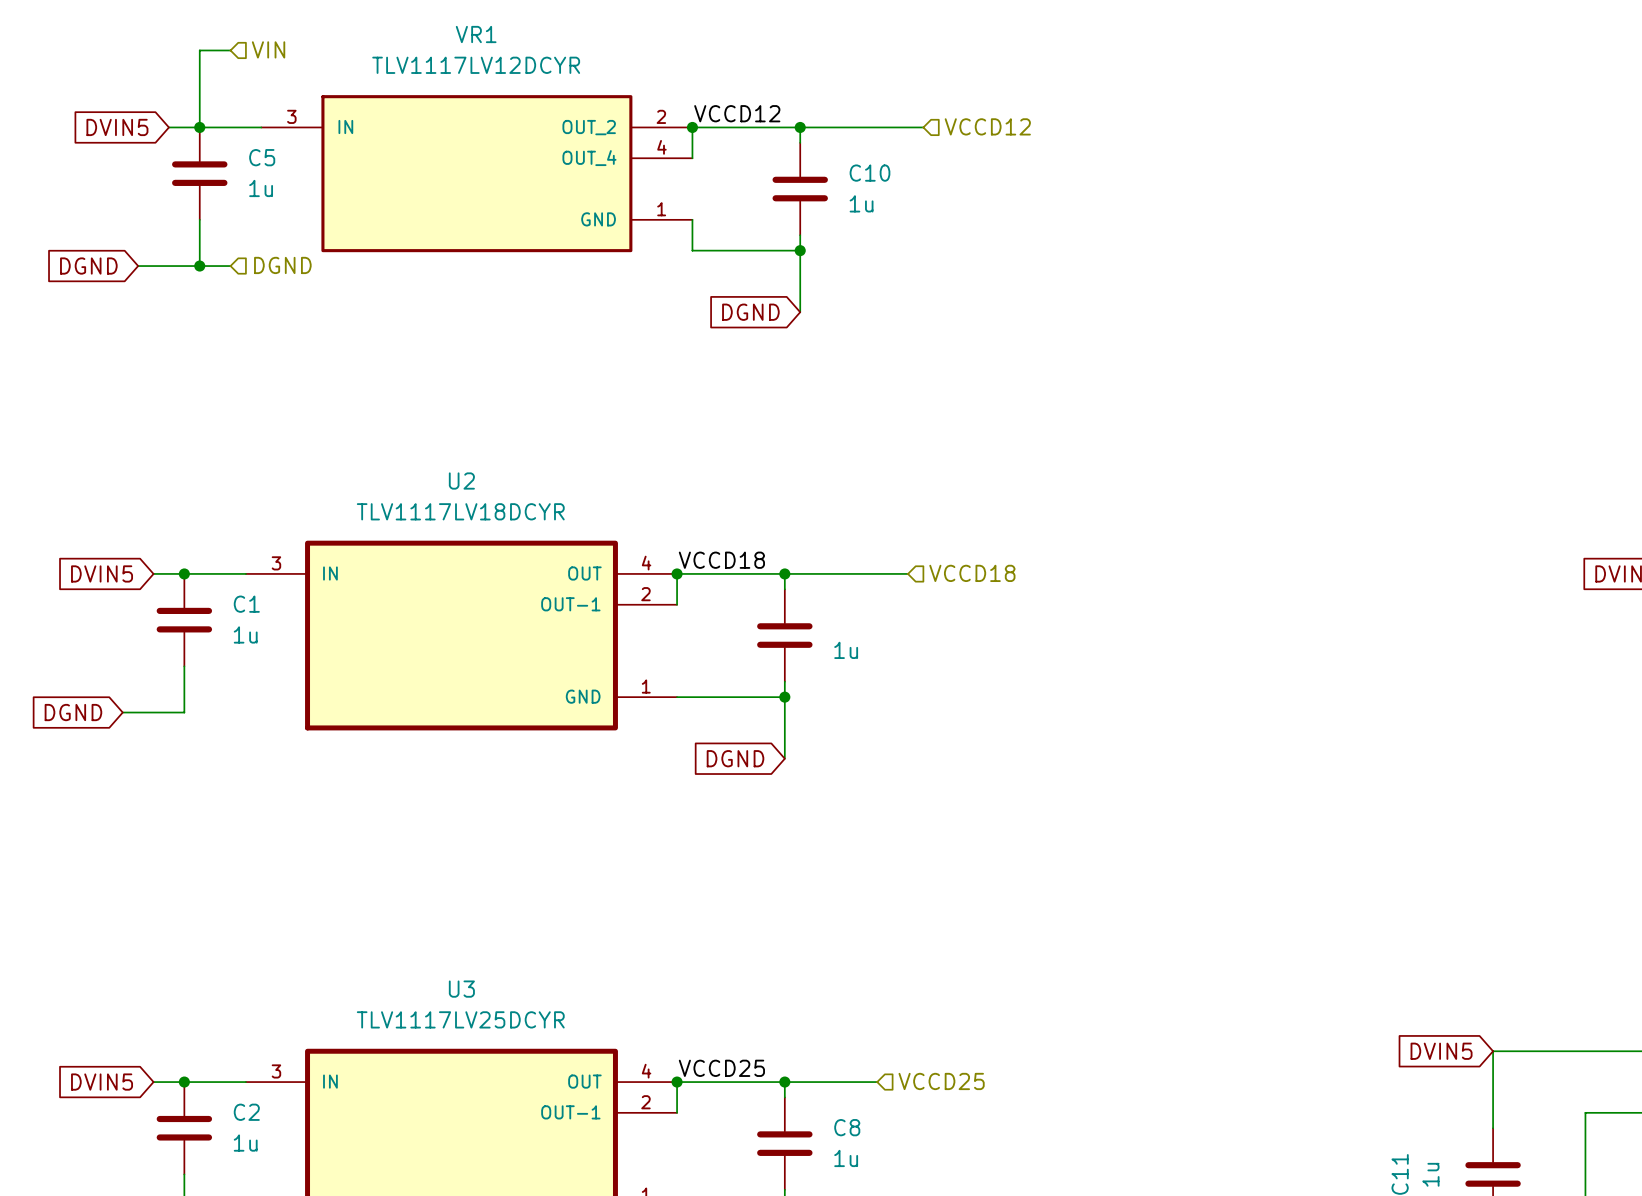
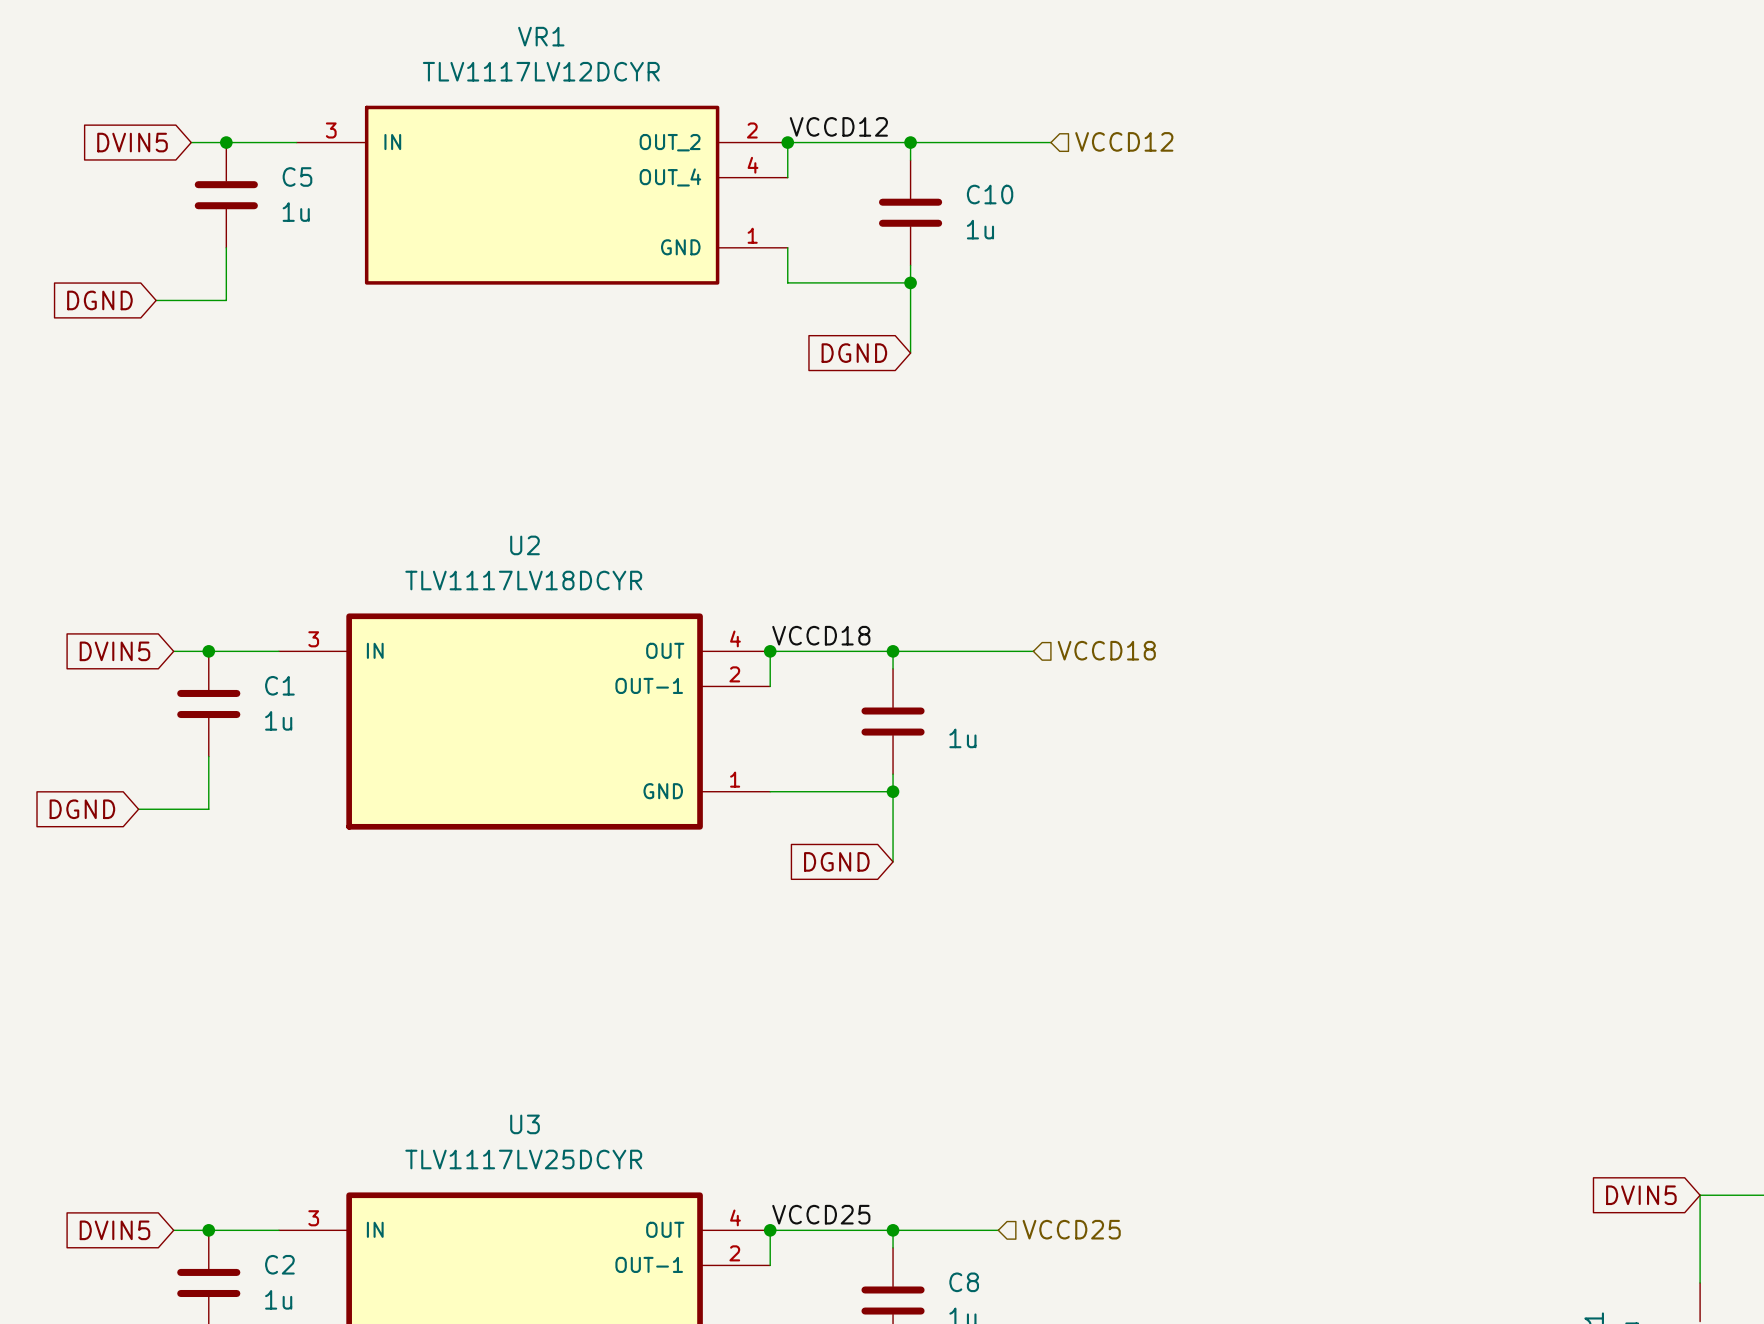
hierarchical label: VIN (268, 49) -> none
wire: (230, 50) (199, 50) (199, 127) -> none
hierarchical label: DGND (282, 265) -> none
wire: (199, 266) (230, 266) -> none
junction: (199, 266) -> none

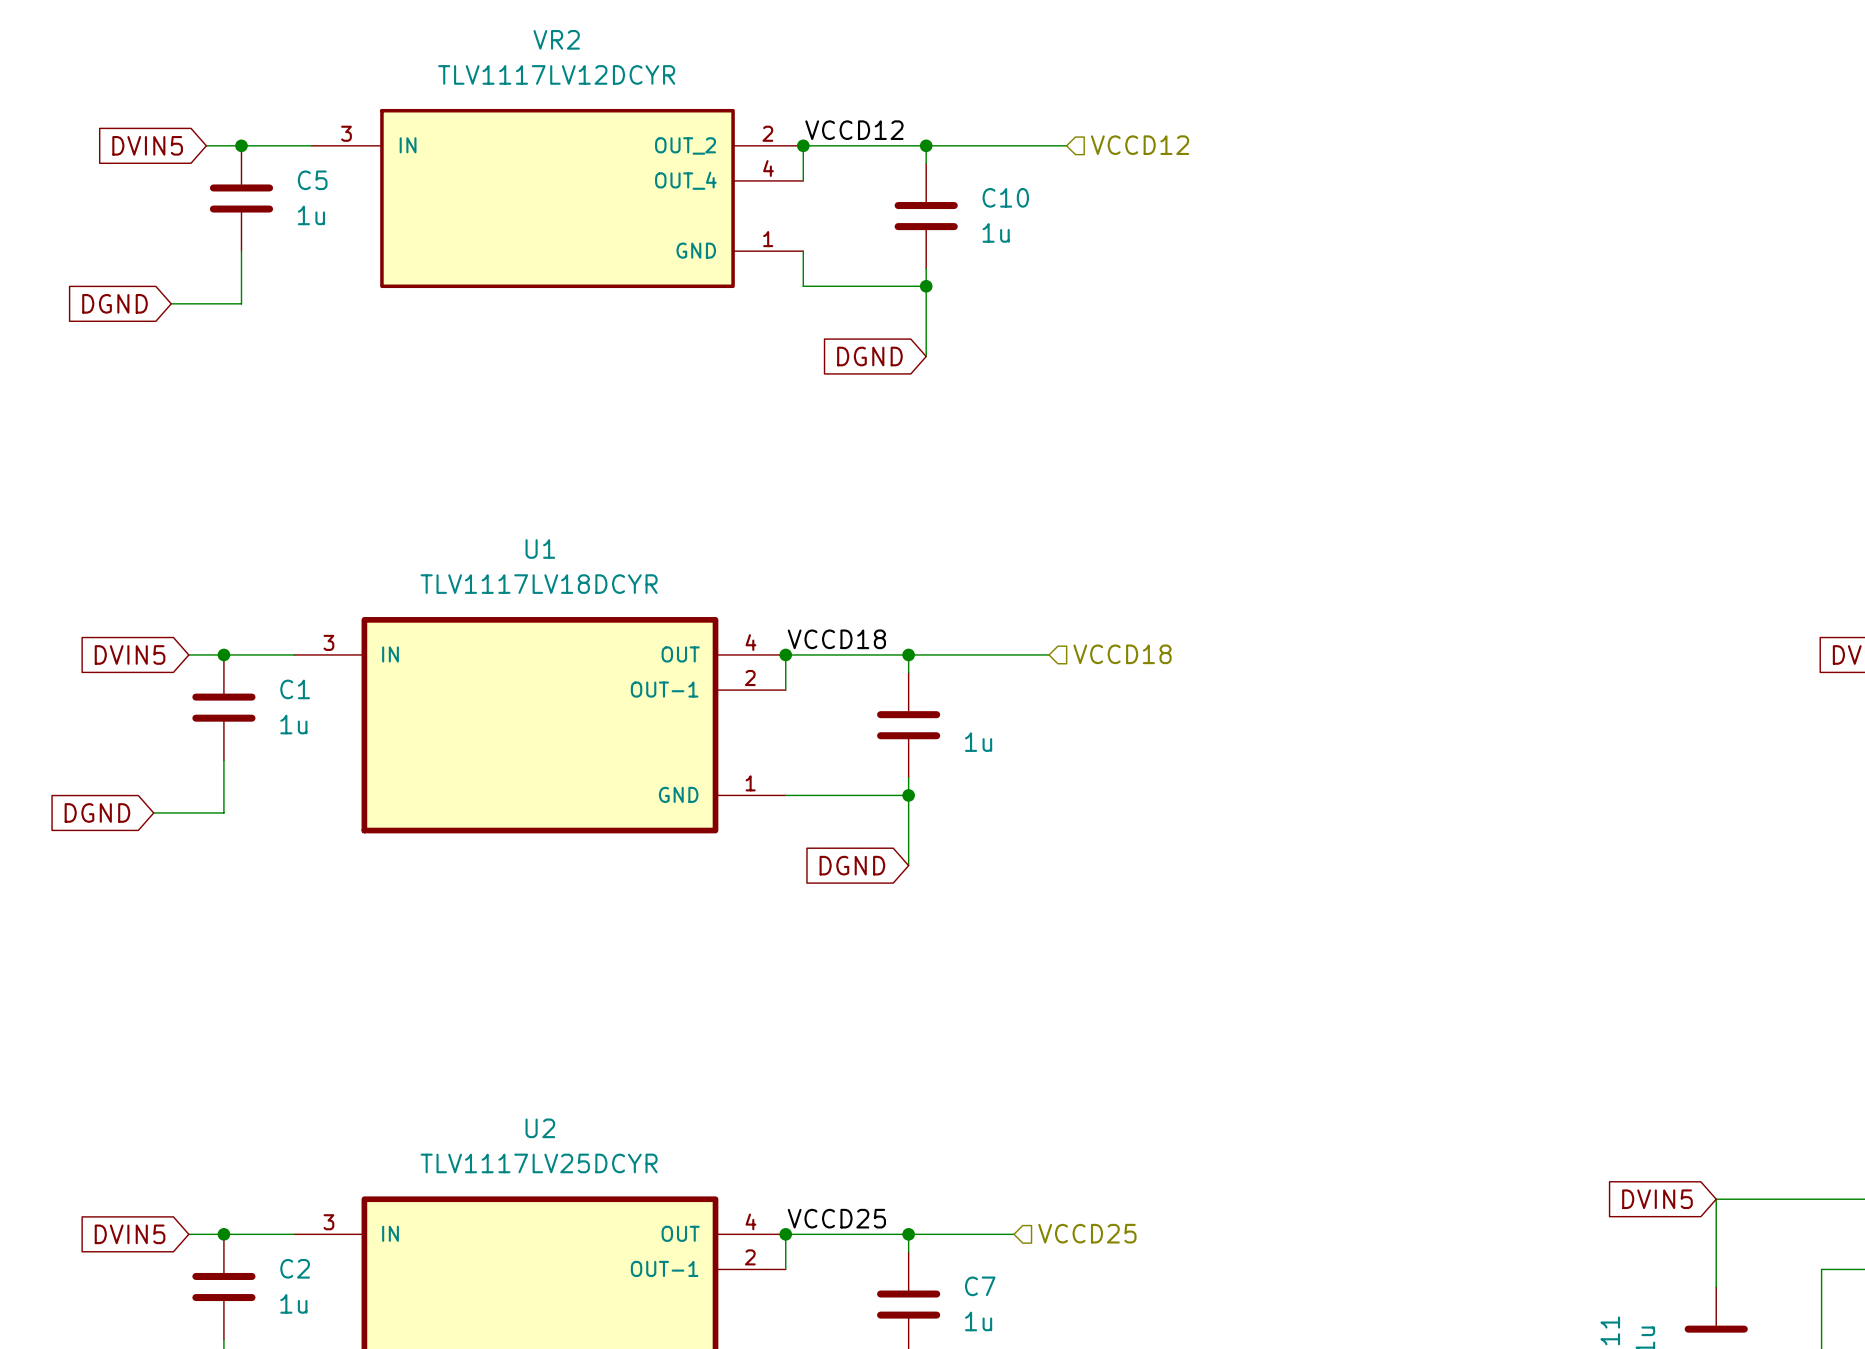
VR1 name: VR1 (541, 36) -> VR2 (556, 39)
U2 name: U2 (525, 545) -> U1 (540, 548)
U3 name: U3 (525, 1124) -> U2 (540, 1128)
C8 name: C8 (964, 1282) -> C7 (980, 1286)

